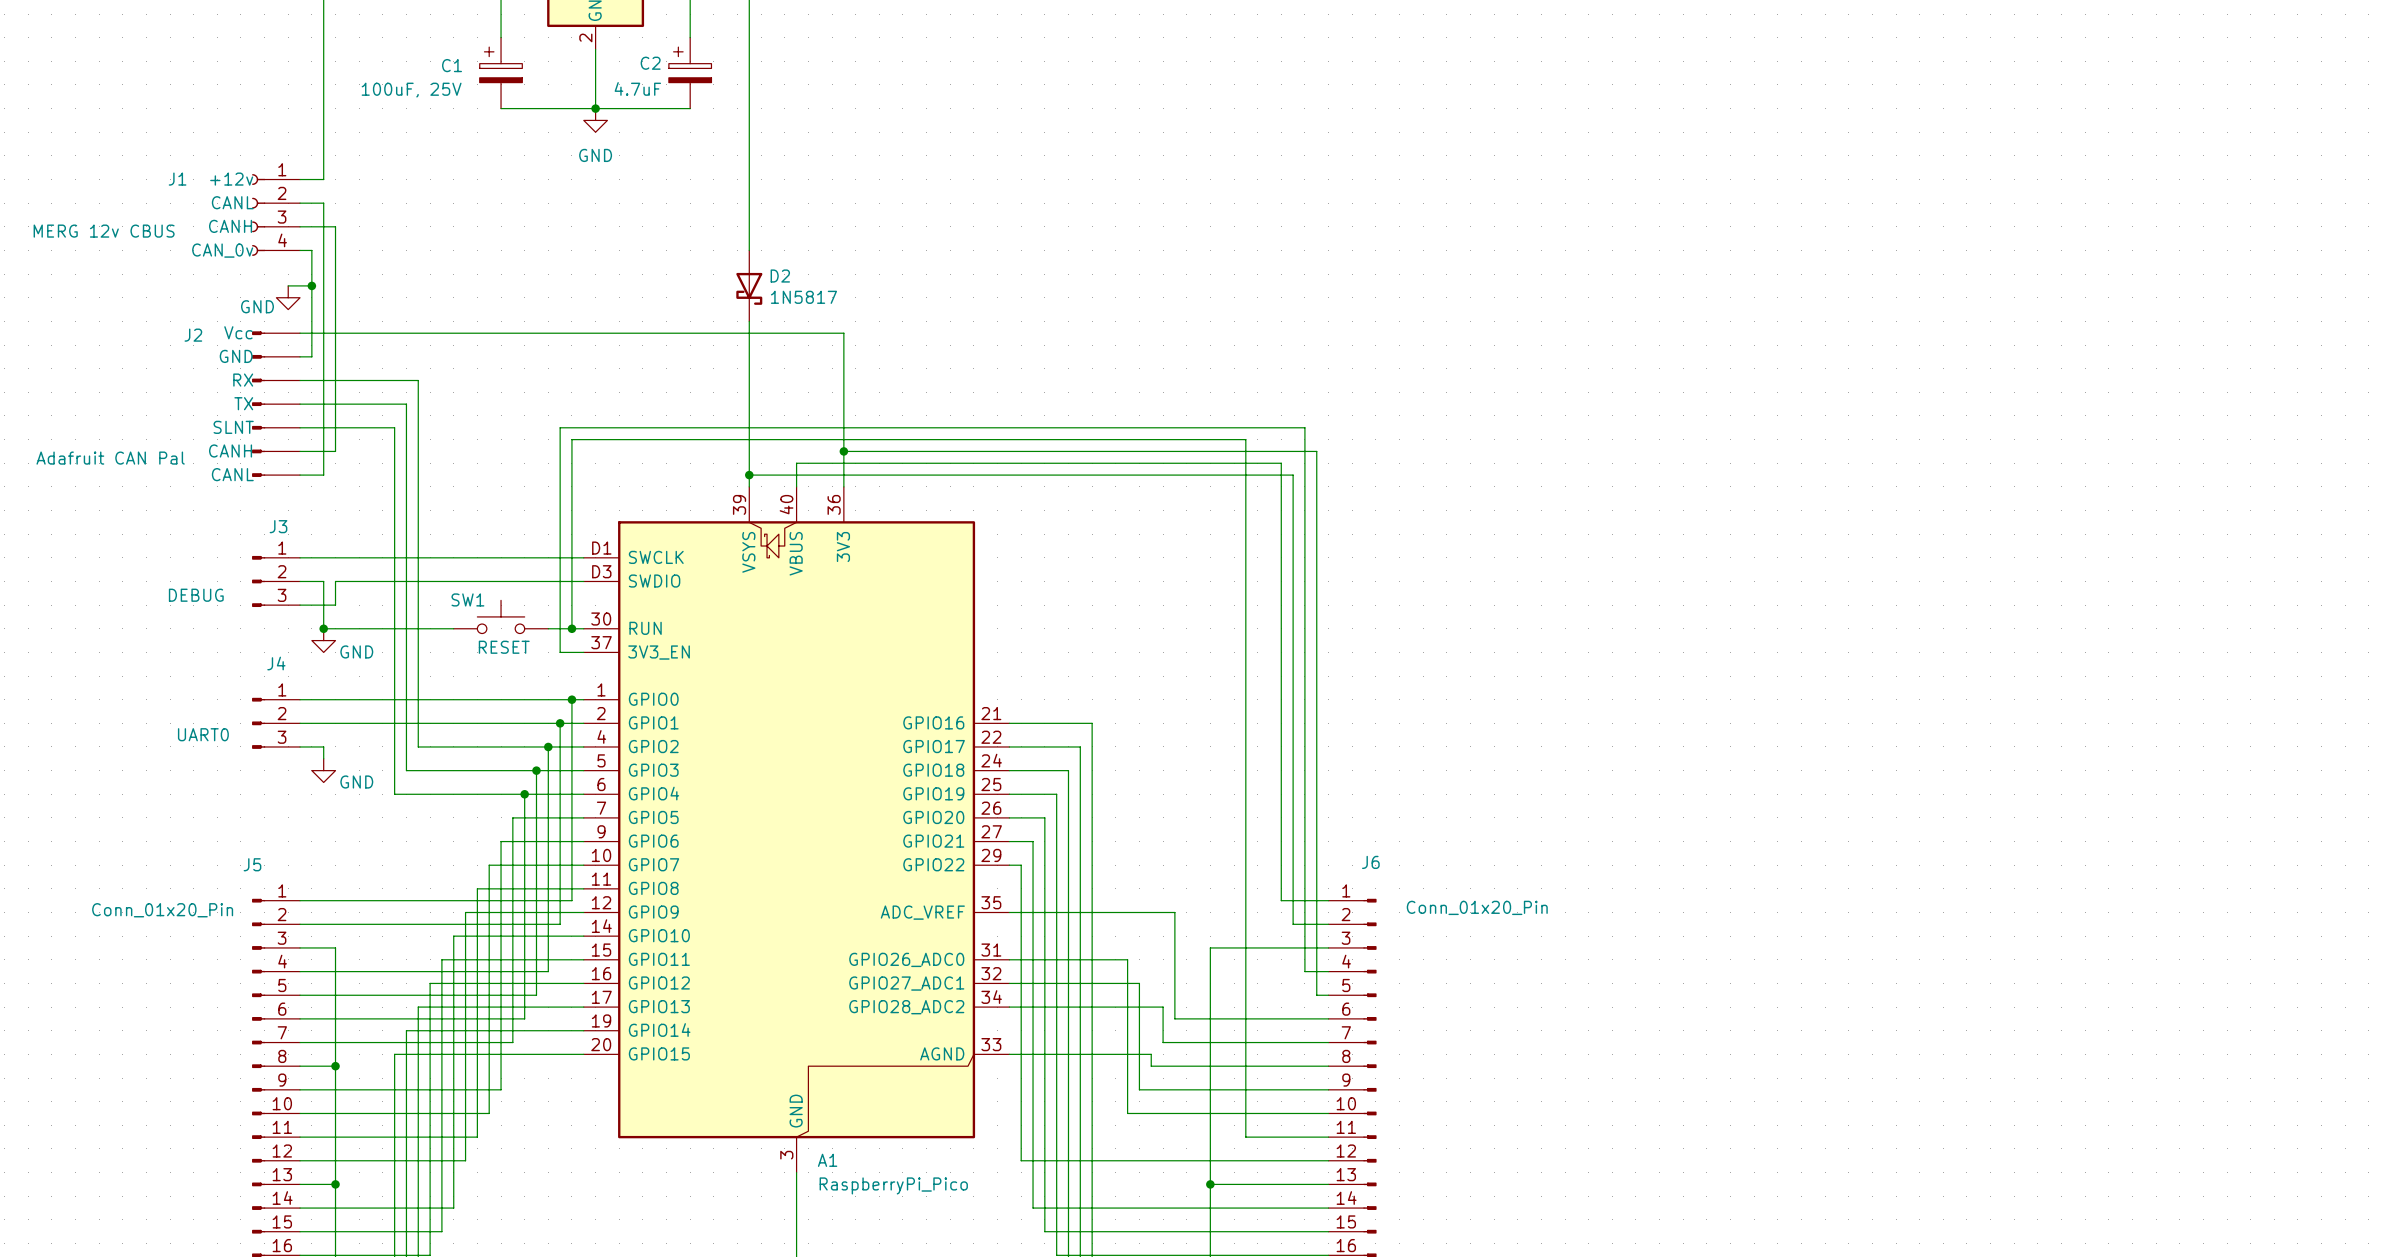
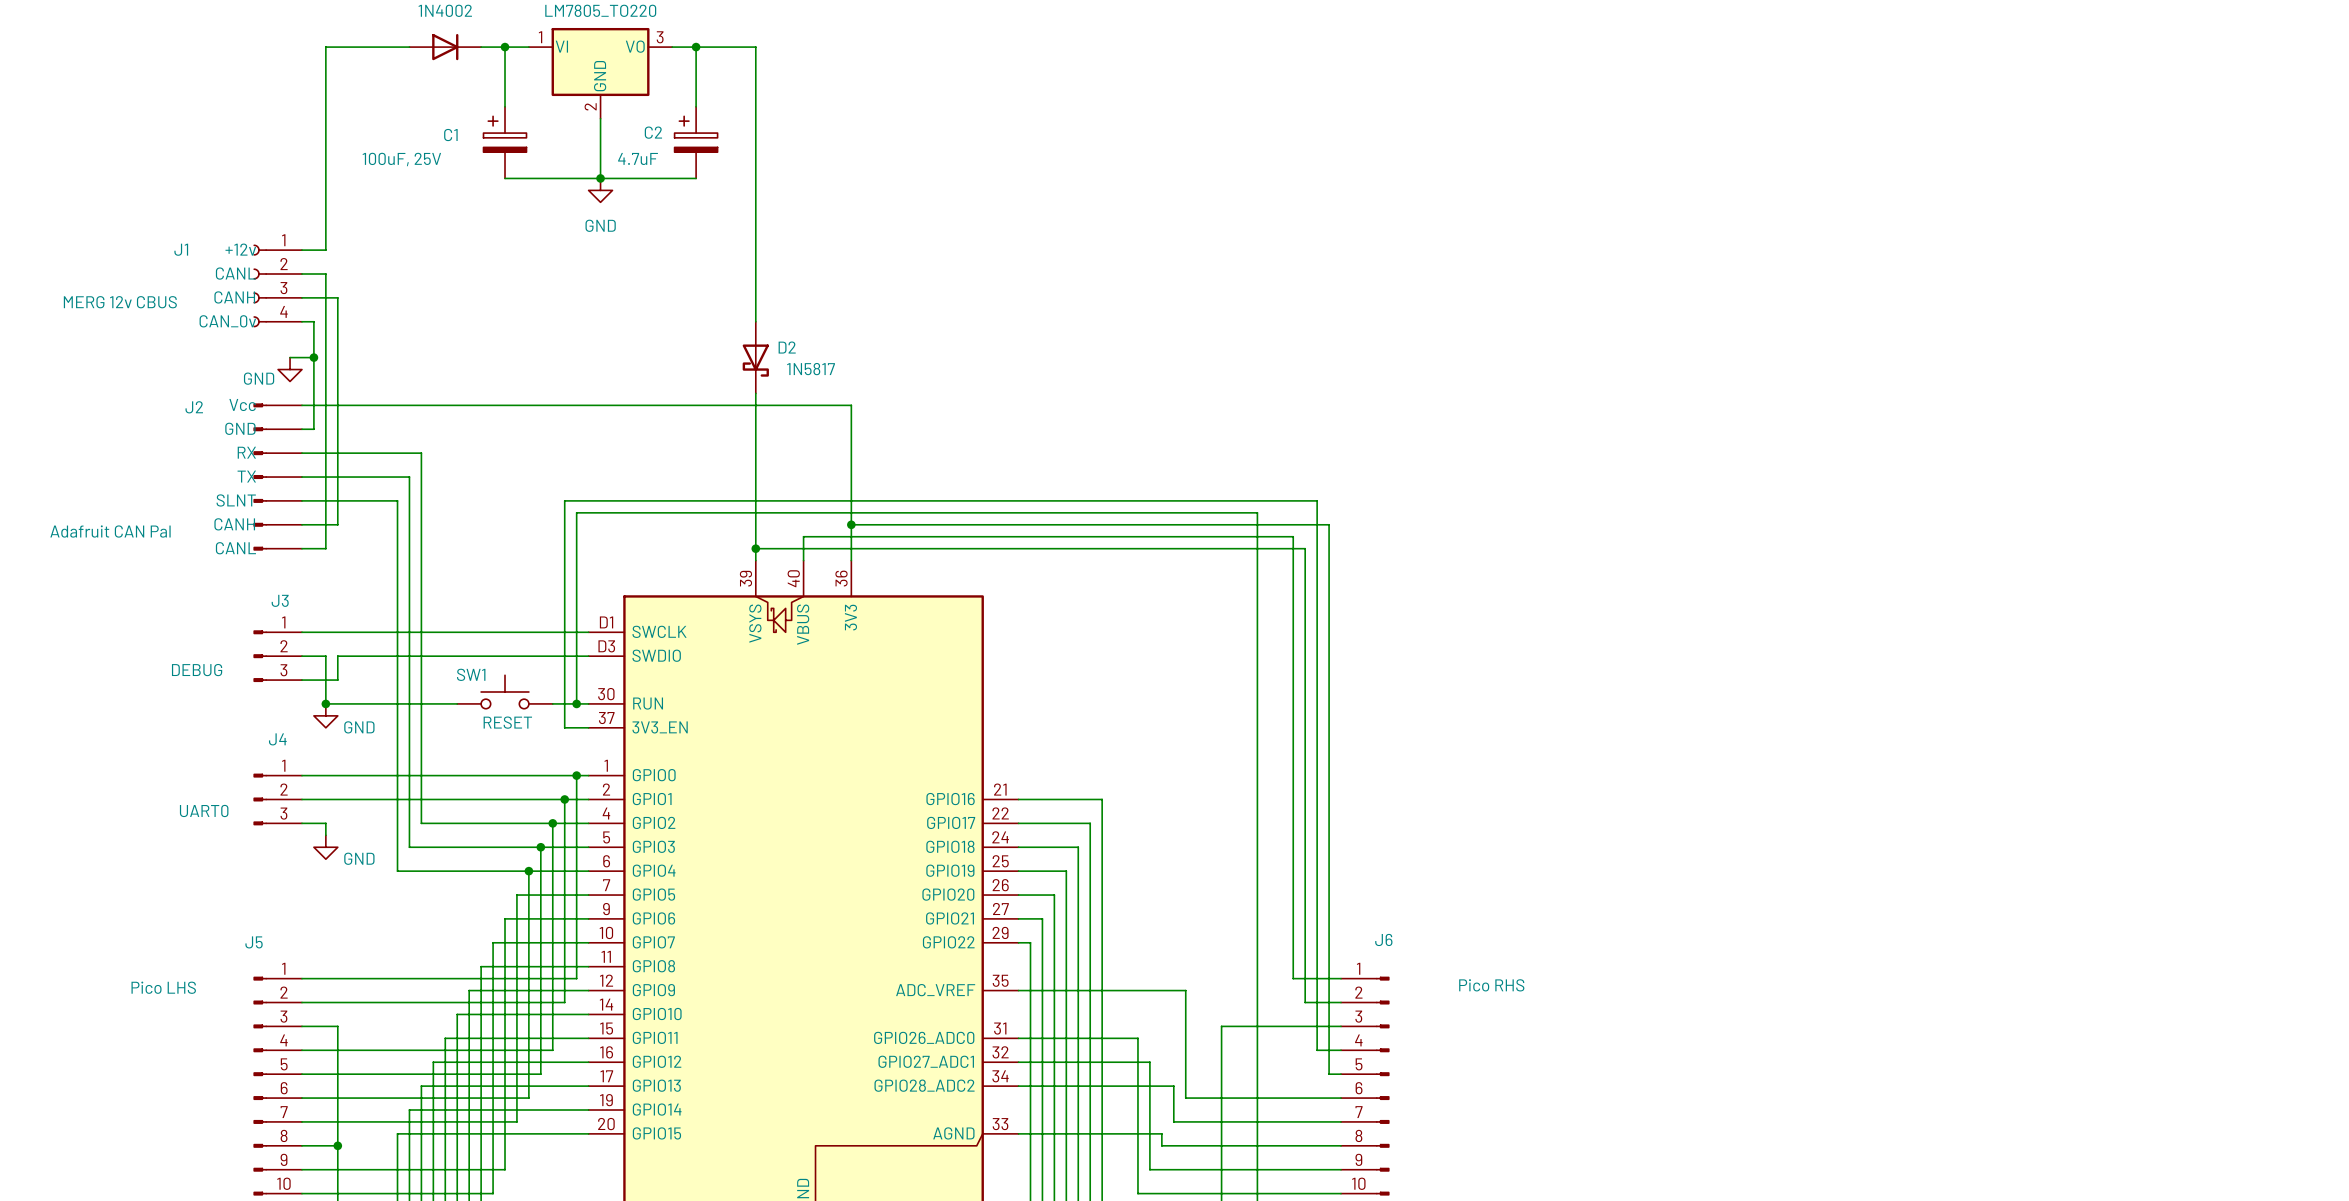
J6 value: Conn_01x20_Pin (1477, 907) -> Pico RHS (1491, 985)
J5 value: Conn_01x20_Pin (162, 910) -> Pico LHS (163, 987)

